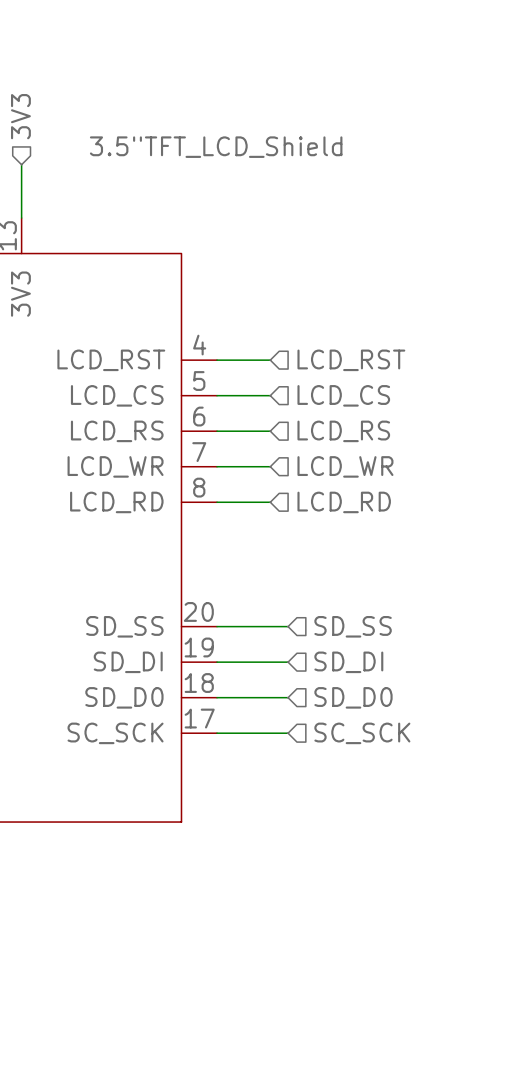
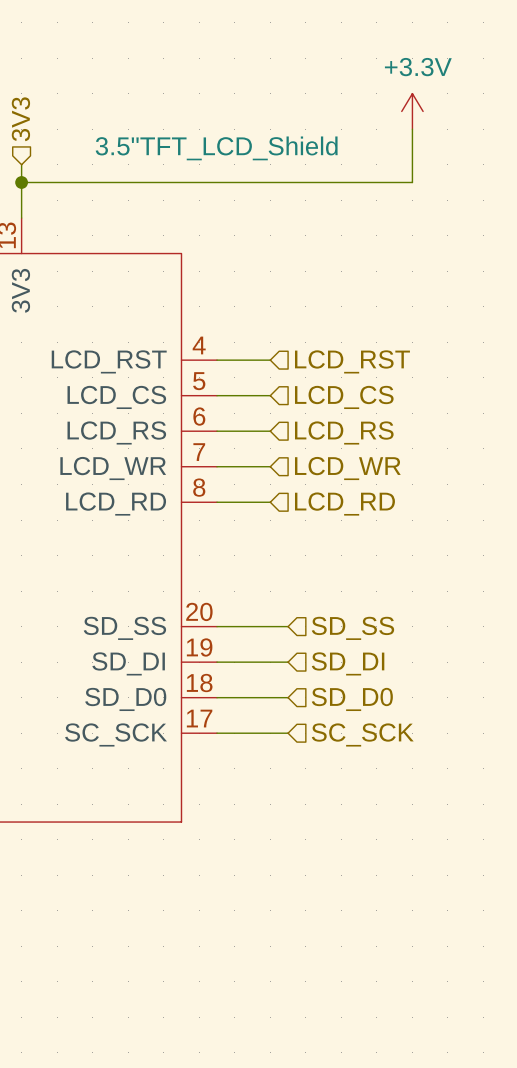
power symbol: none -> +3.3V (412, 111)
wire: none -> (412, 129) (412, 182) (21, 182)
junction: none -> (21, 182)

